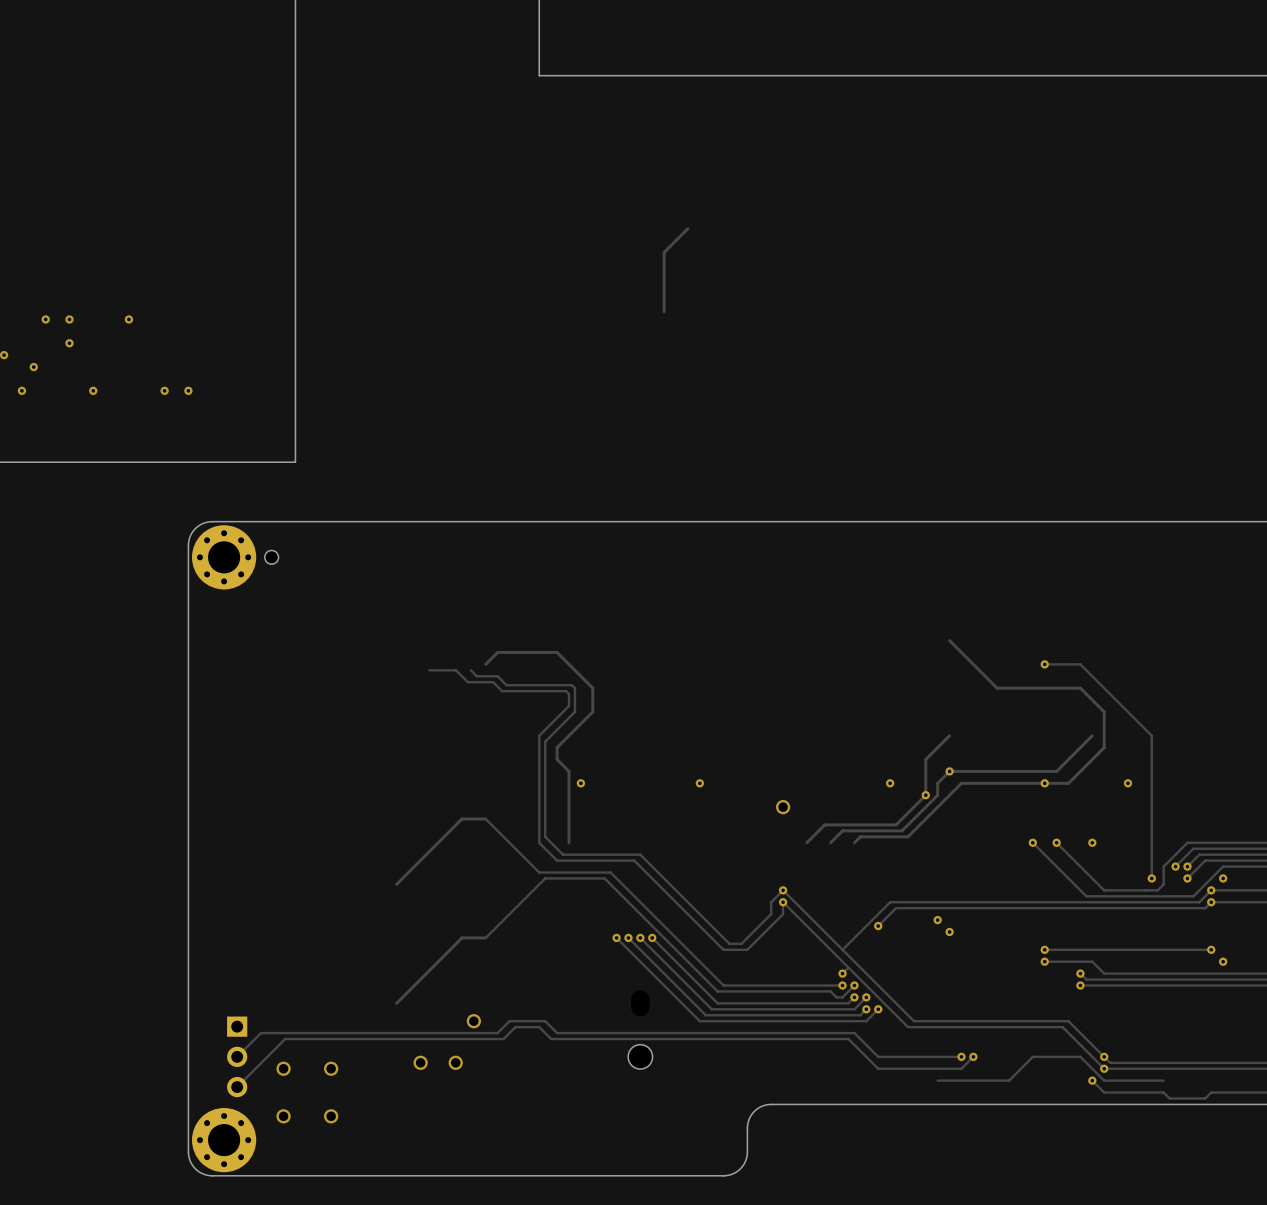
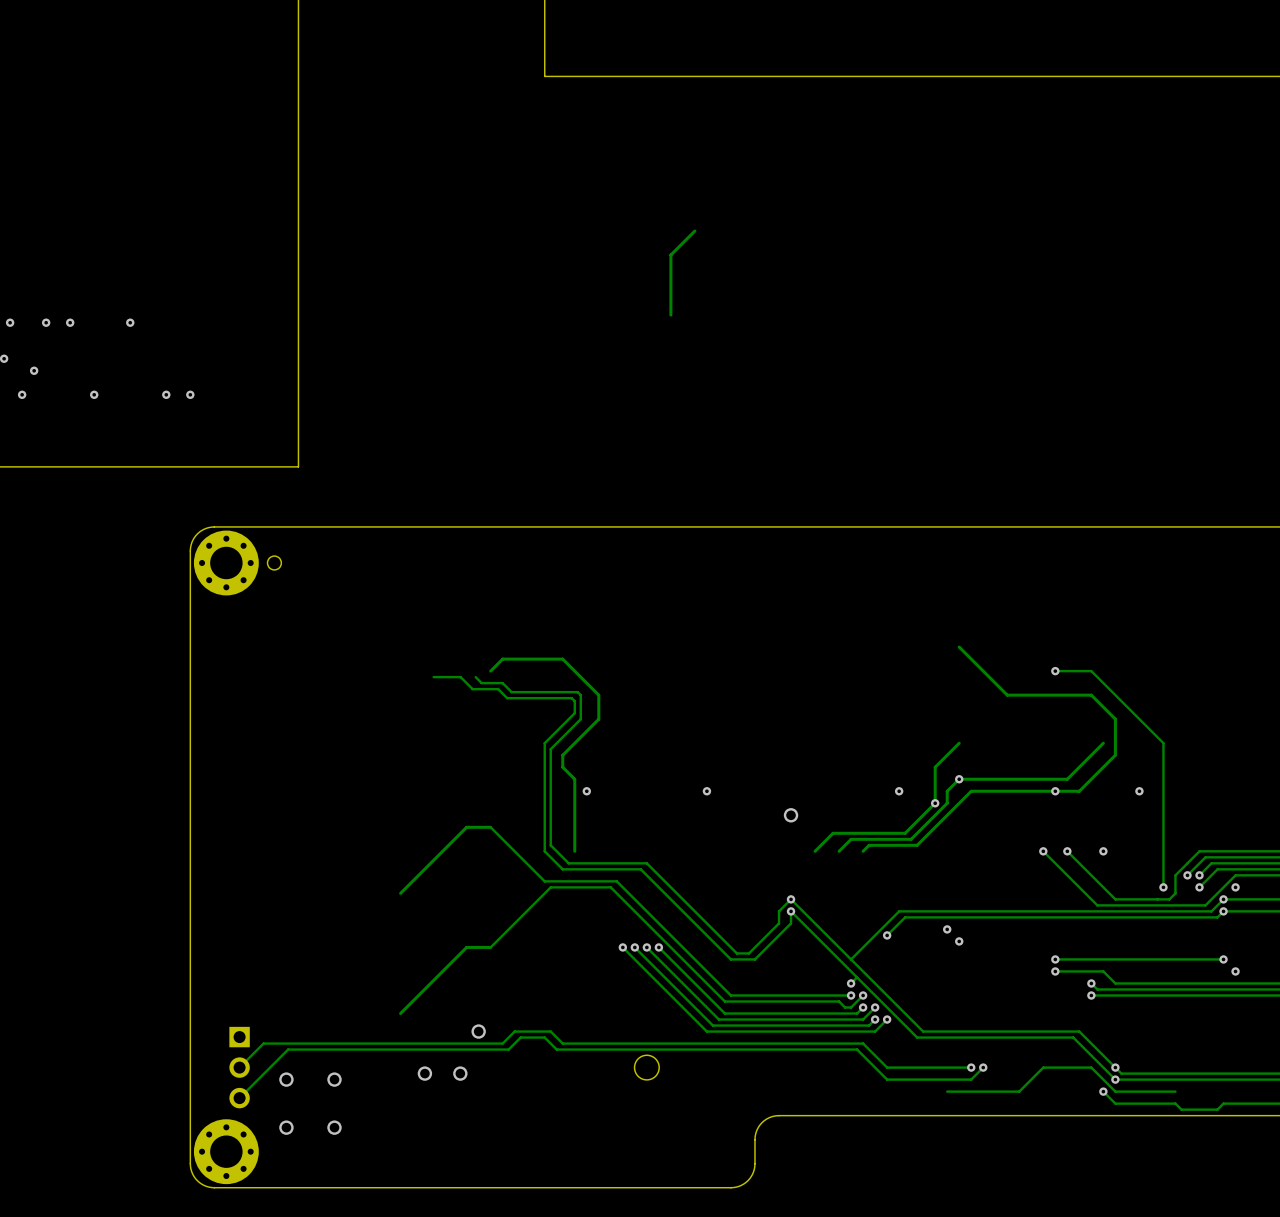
via: none -> (10, 322)
via: (69, 343) -> none

